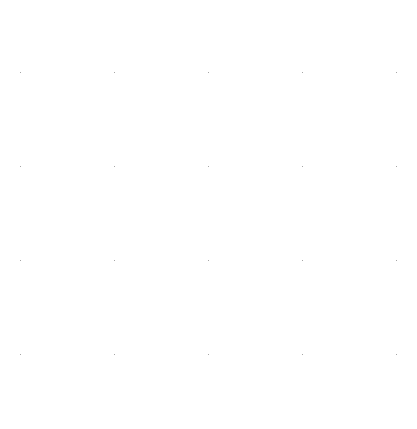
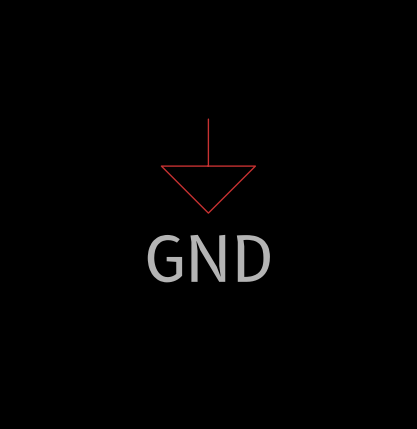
power symbol: none -> GND (208, 166)

